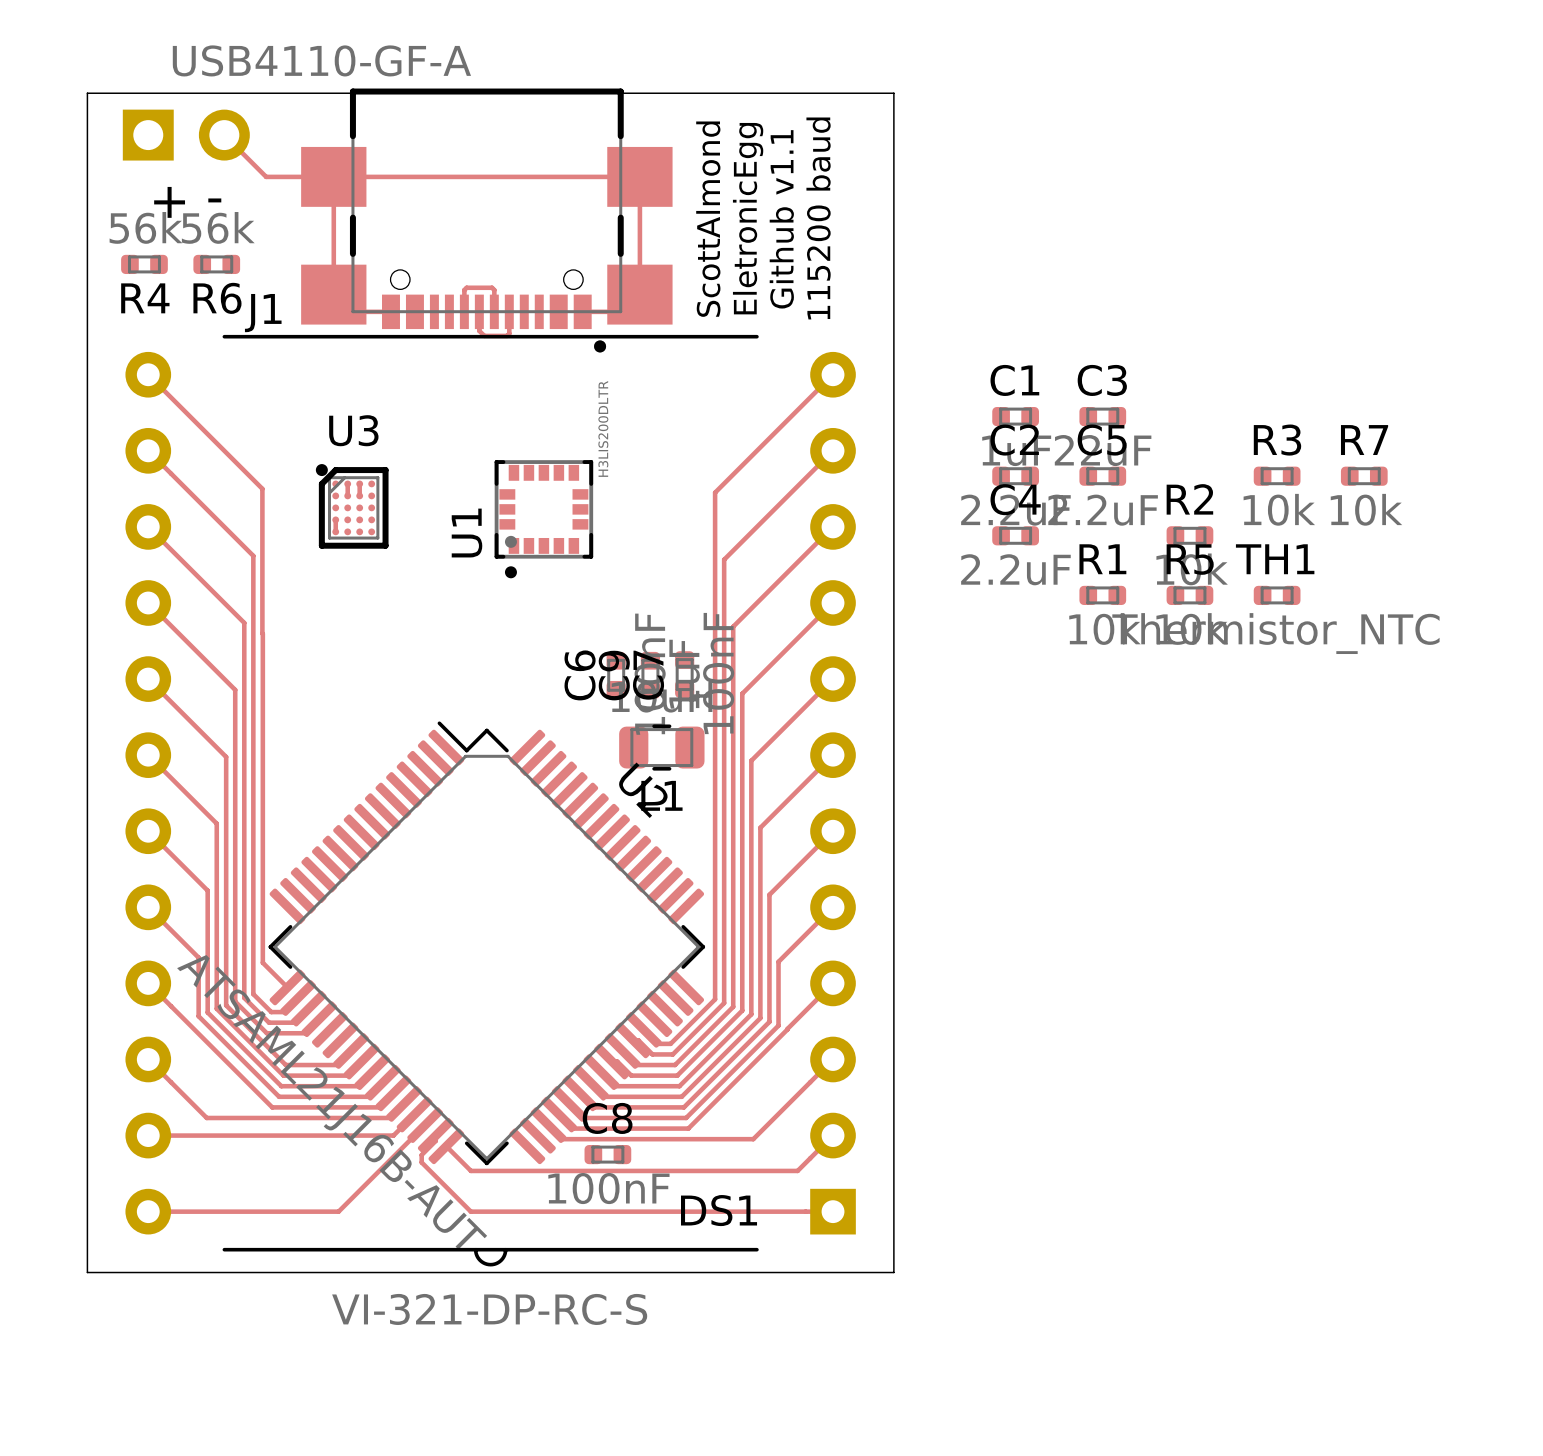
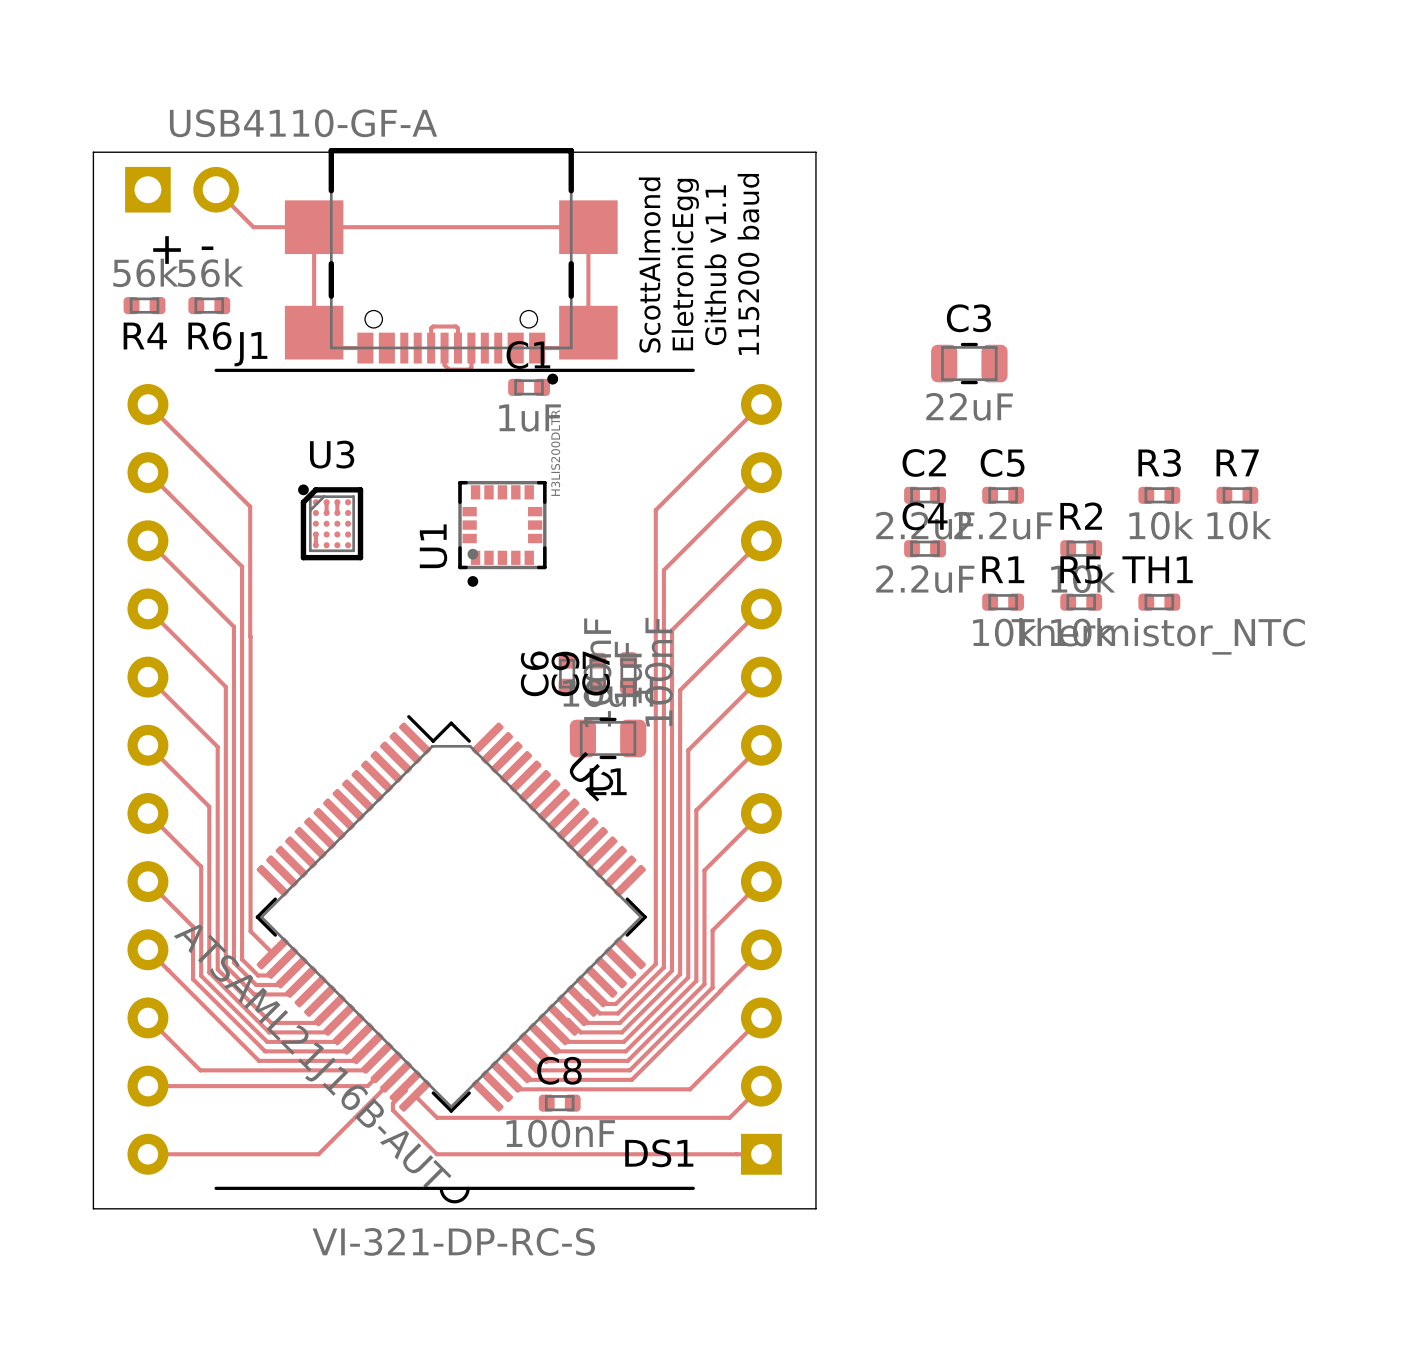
C3 footprint: [1079, 407, 1127, 427] -> [931, 342, 1008, 385]
C1 position: (1015, 416) -> (529, 387)

